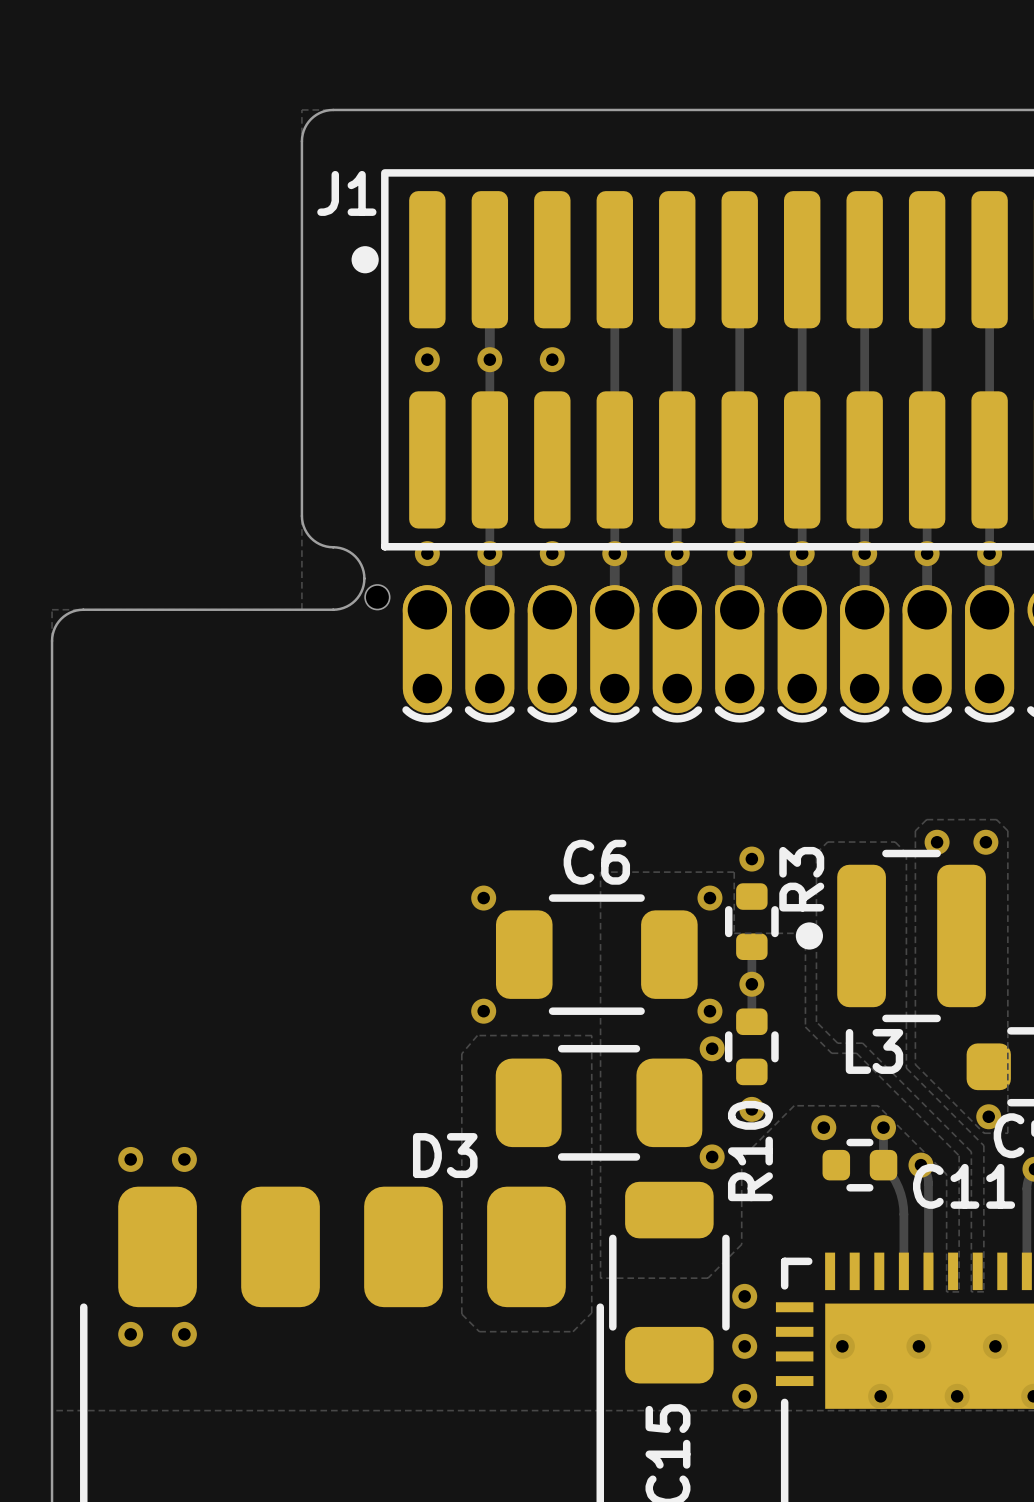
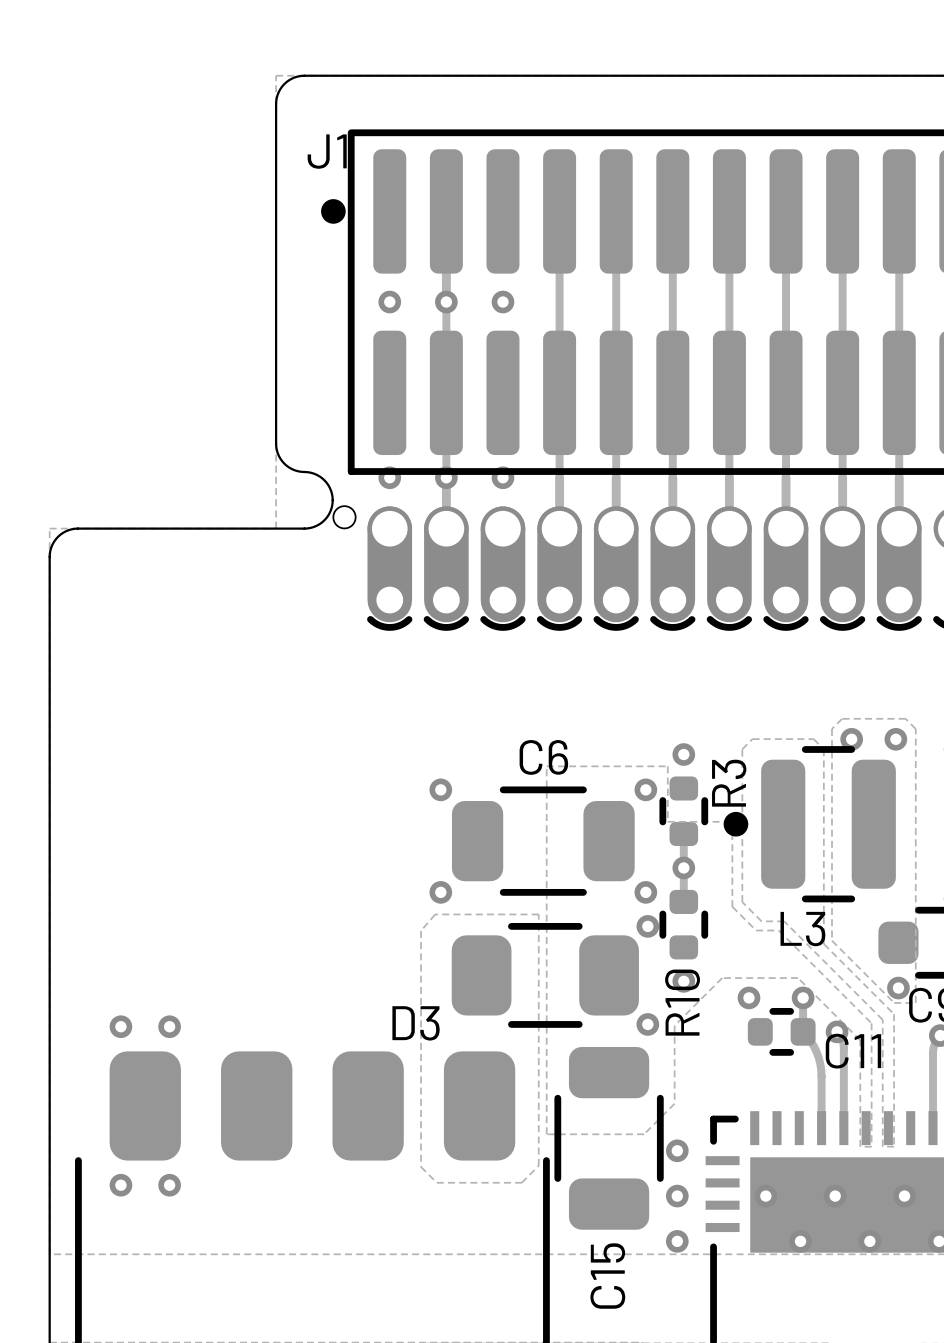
via: (614, 553) -> none
via: (677, 553) -> none
via: (739, 553) -> none
via: (802, 553) -> none
via: (864, 553) -> none
via: (927, 553) -> none
via: (989, 553) -> none

